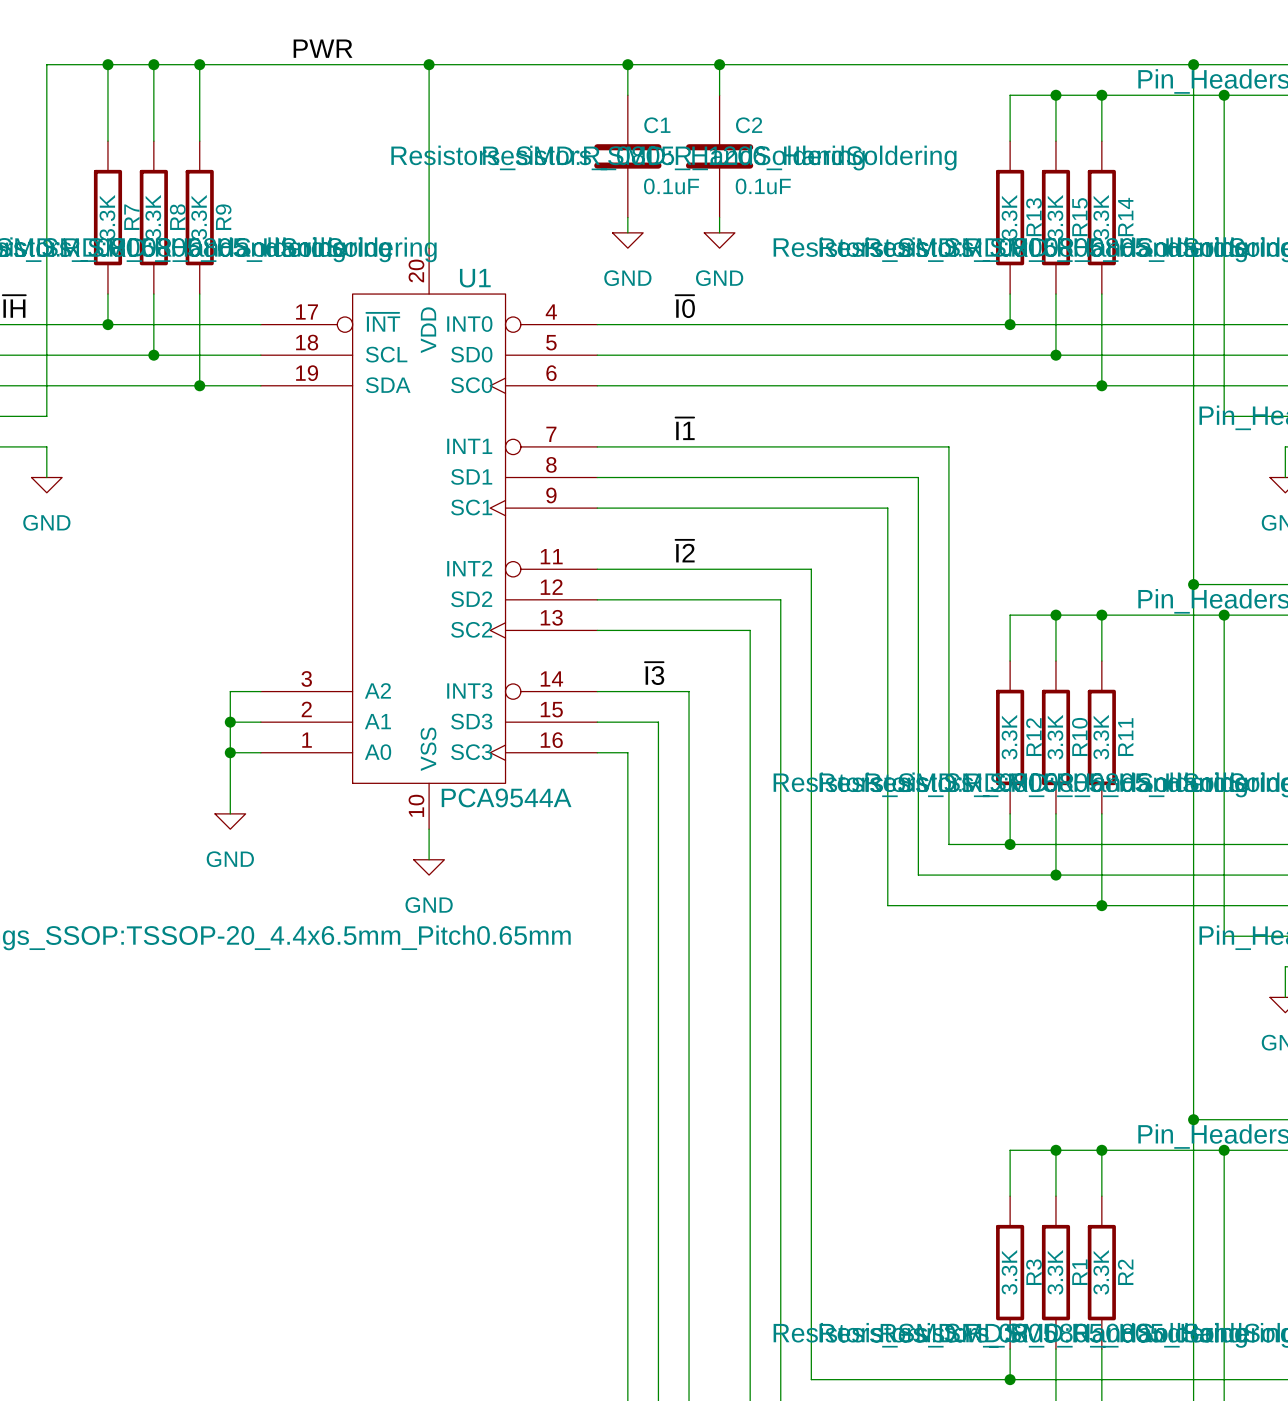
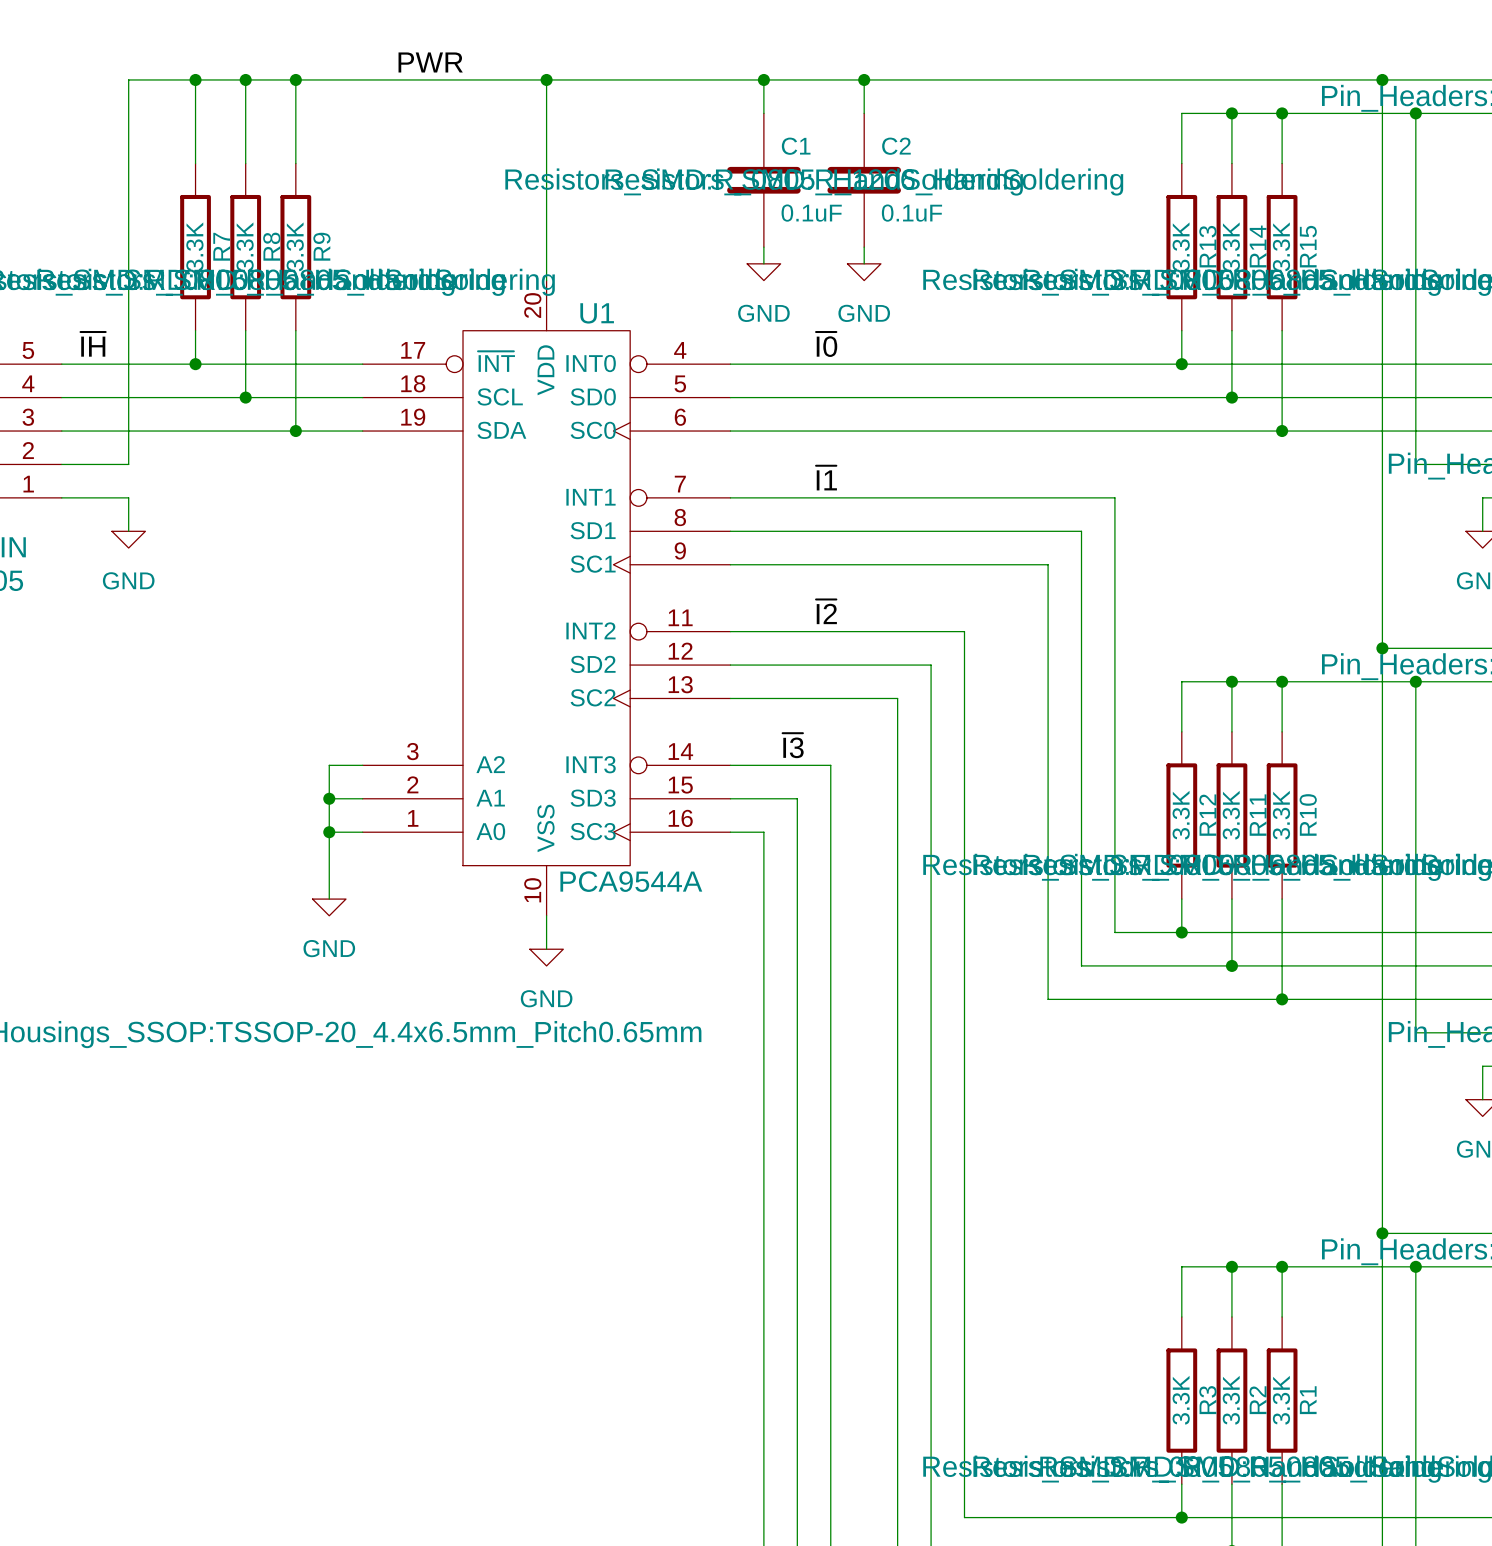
R14 name: R14 (1125, 216) -> R15 (1308, 246)
R15 name: R15 (1079, 217) -> R14 (1258, 246)
R10 name: R10 (1079, 736) -> R11 (1258, 815)
R11 name: R11 (1125, 737) -> R10 (1308, 814)
R1 name: R1 (1079, 1272) -> R2 (1257, 1400)
R2 name: R2 (1125, 1272) -> R1 (1308, 1400)

